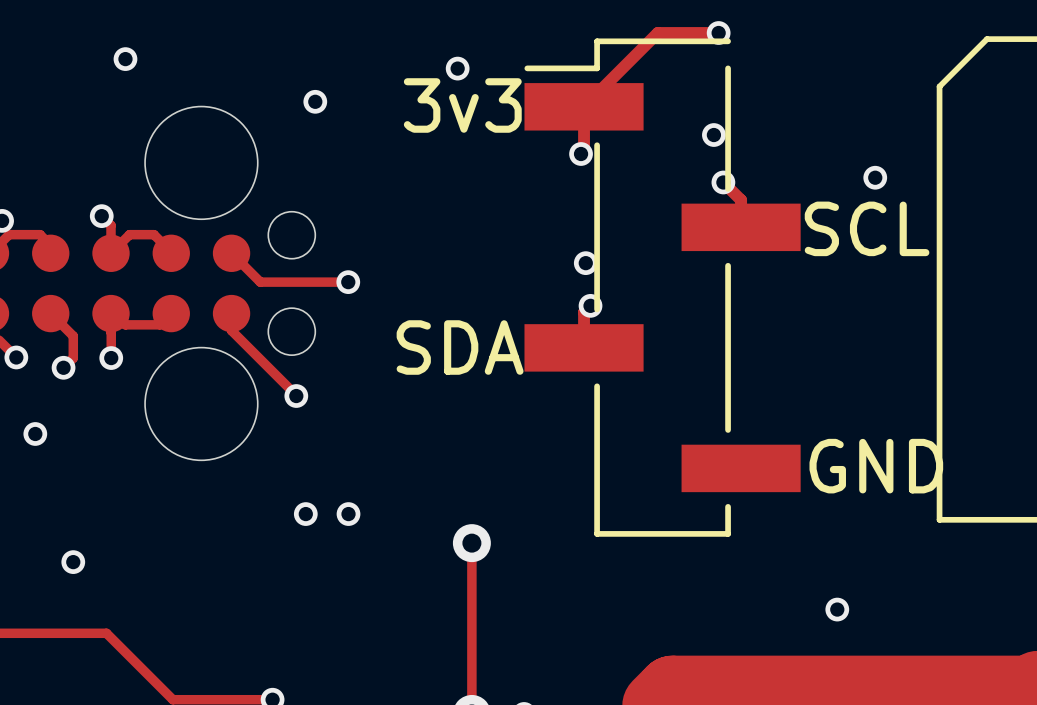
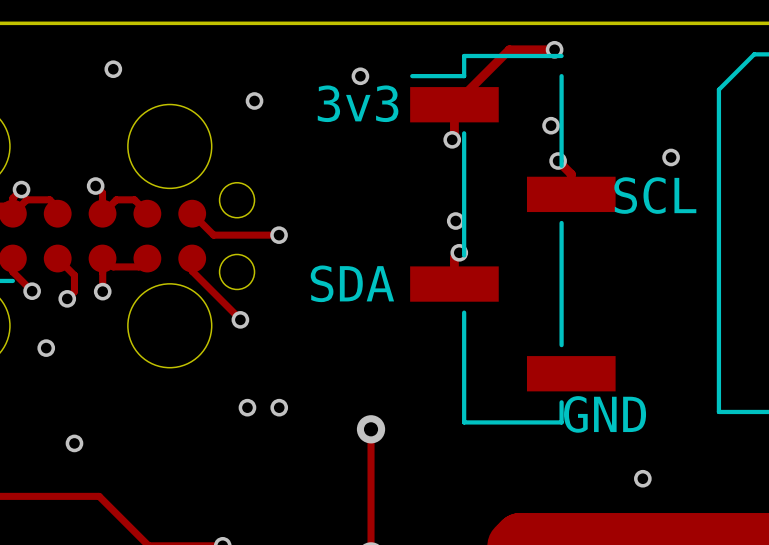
text position: GND (876, 466) -> GND (605, 414)

